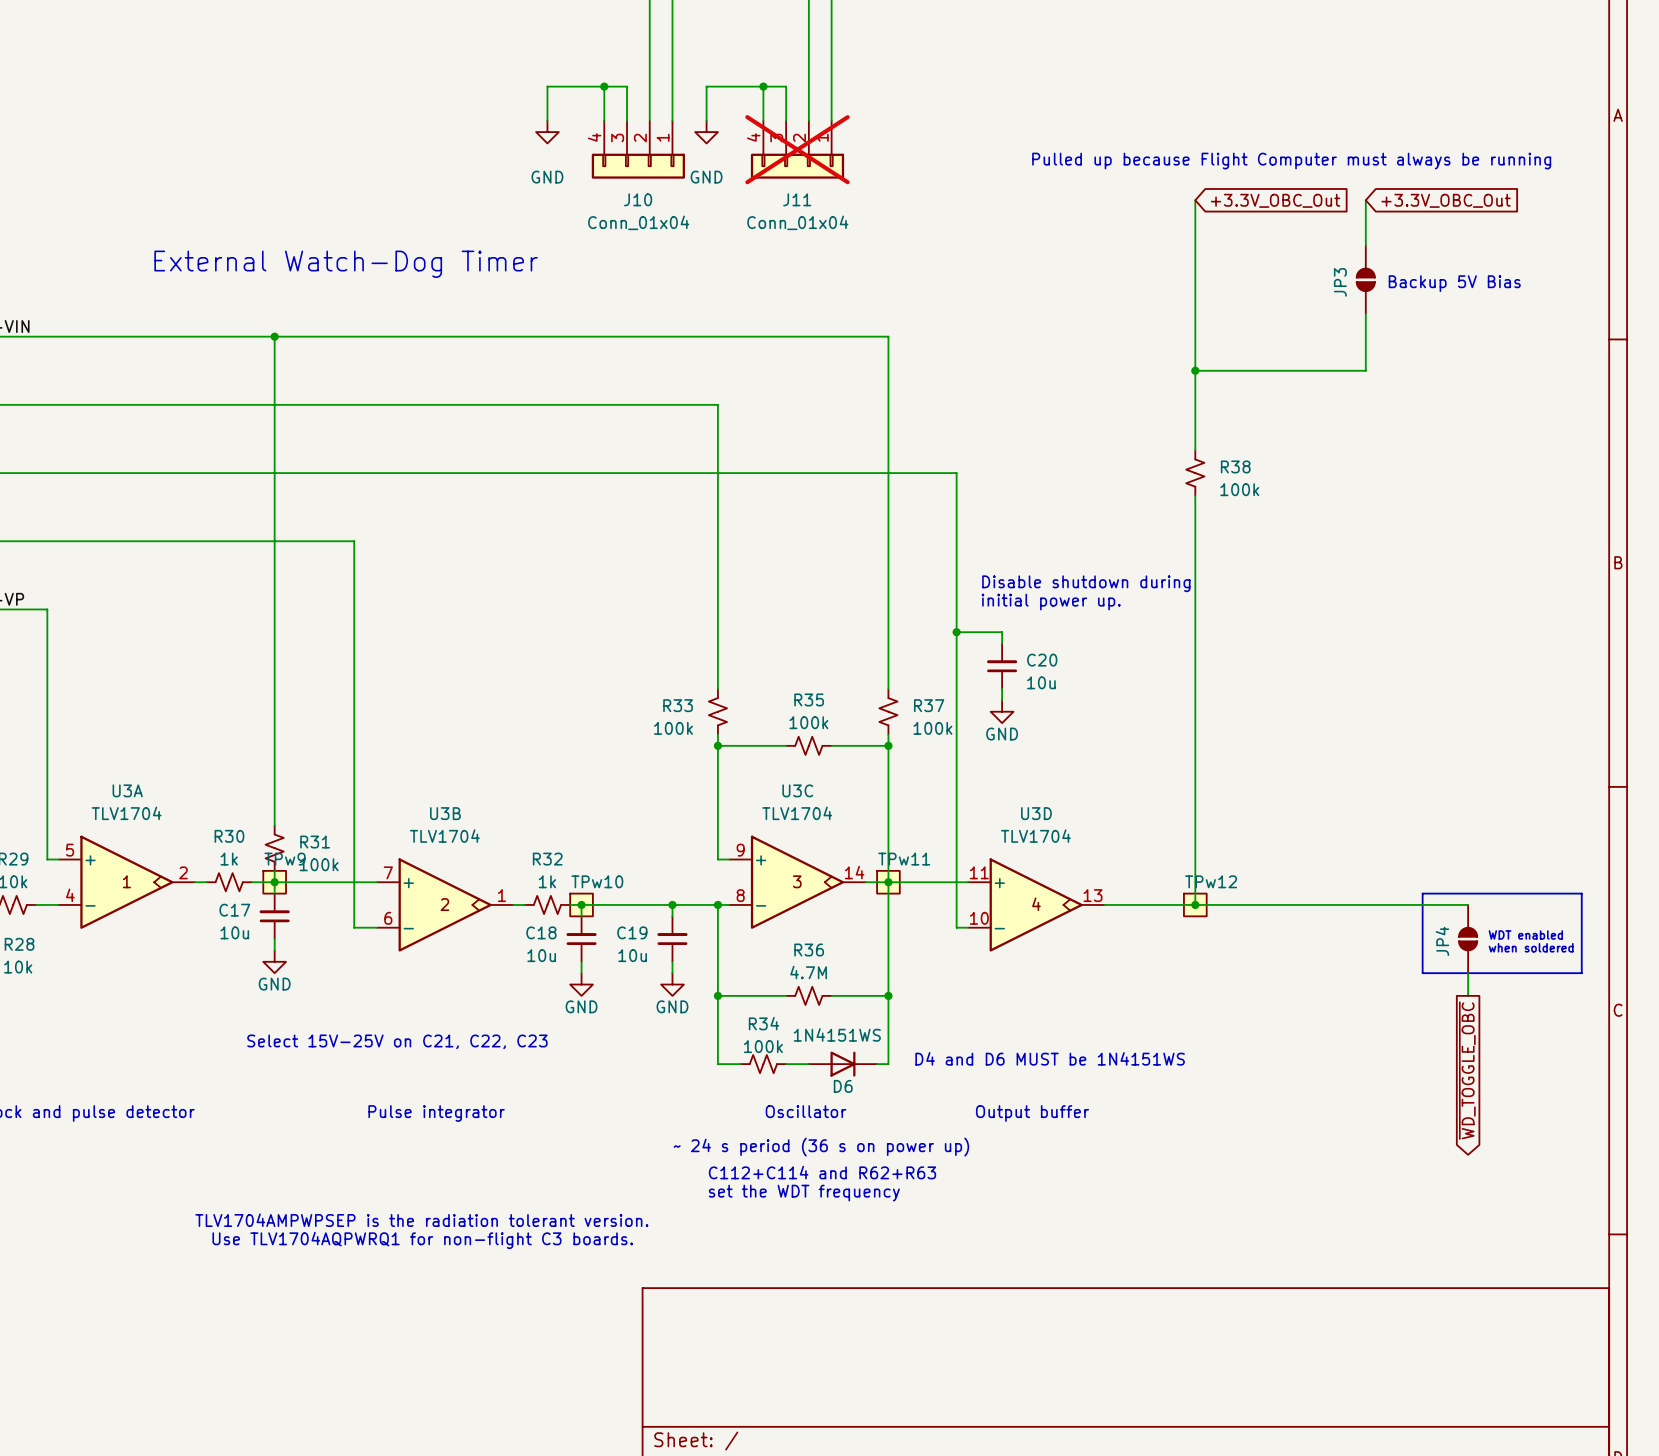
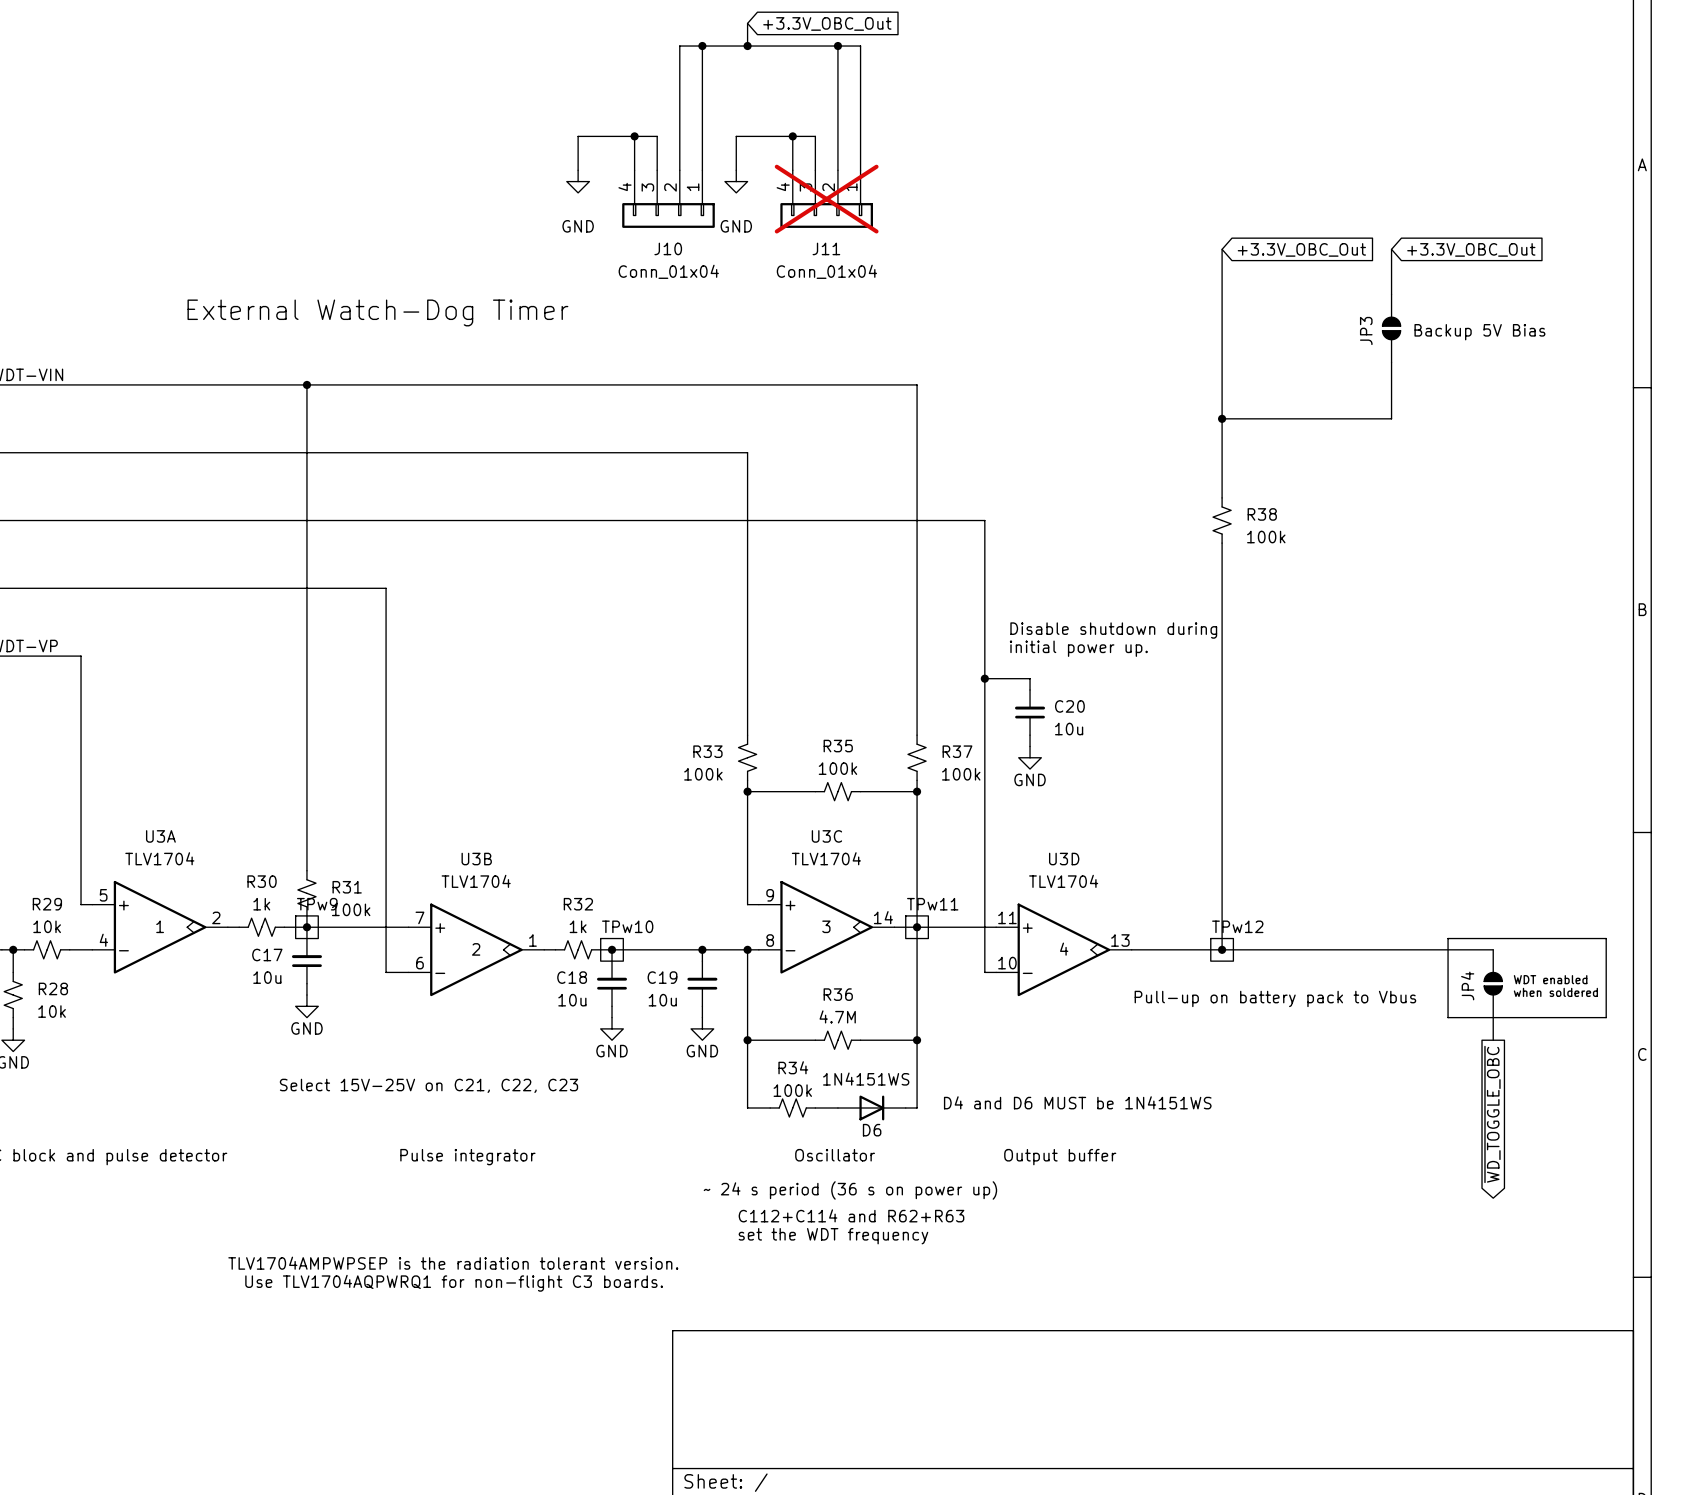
text: Pulled up because Flight Computer must always be running (1291, 161) -> none
text: none -> Pull-up on battery pack to Vbus (1275, 998)

